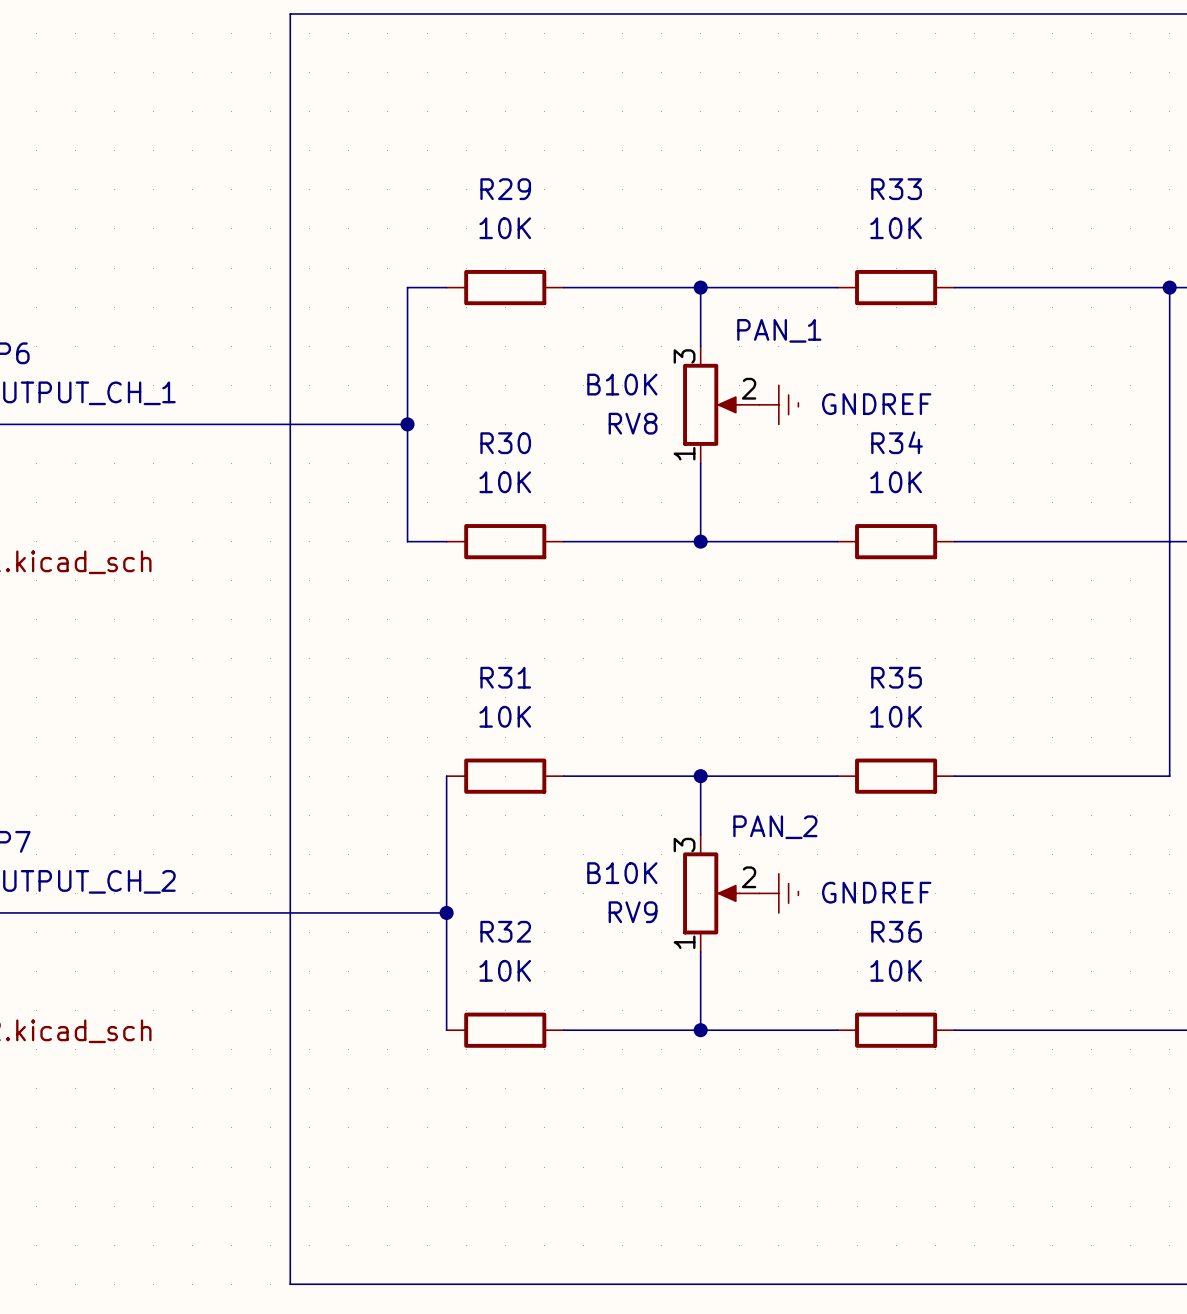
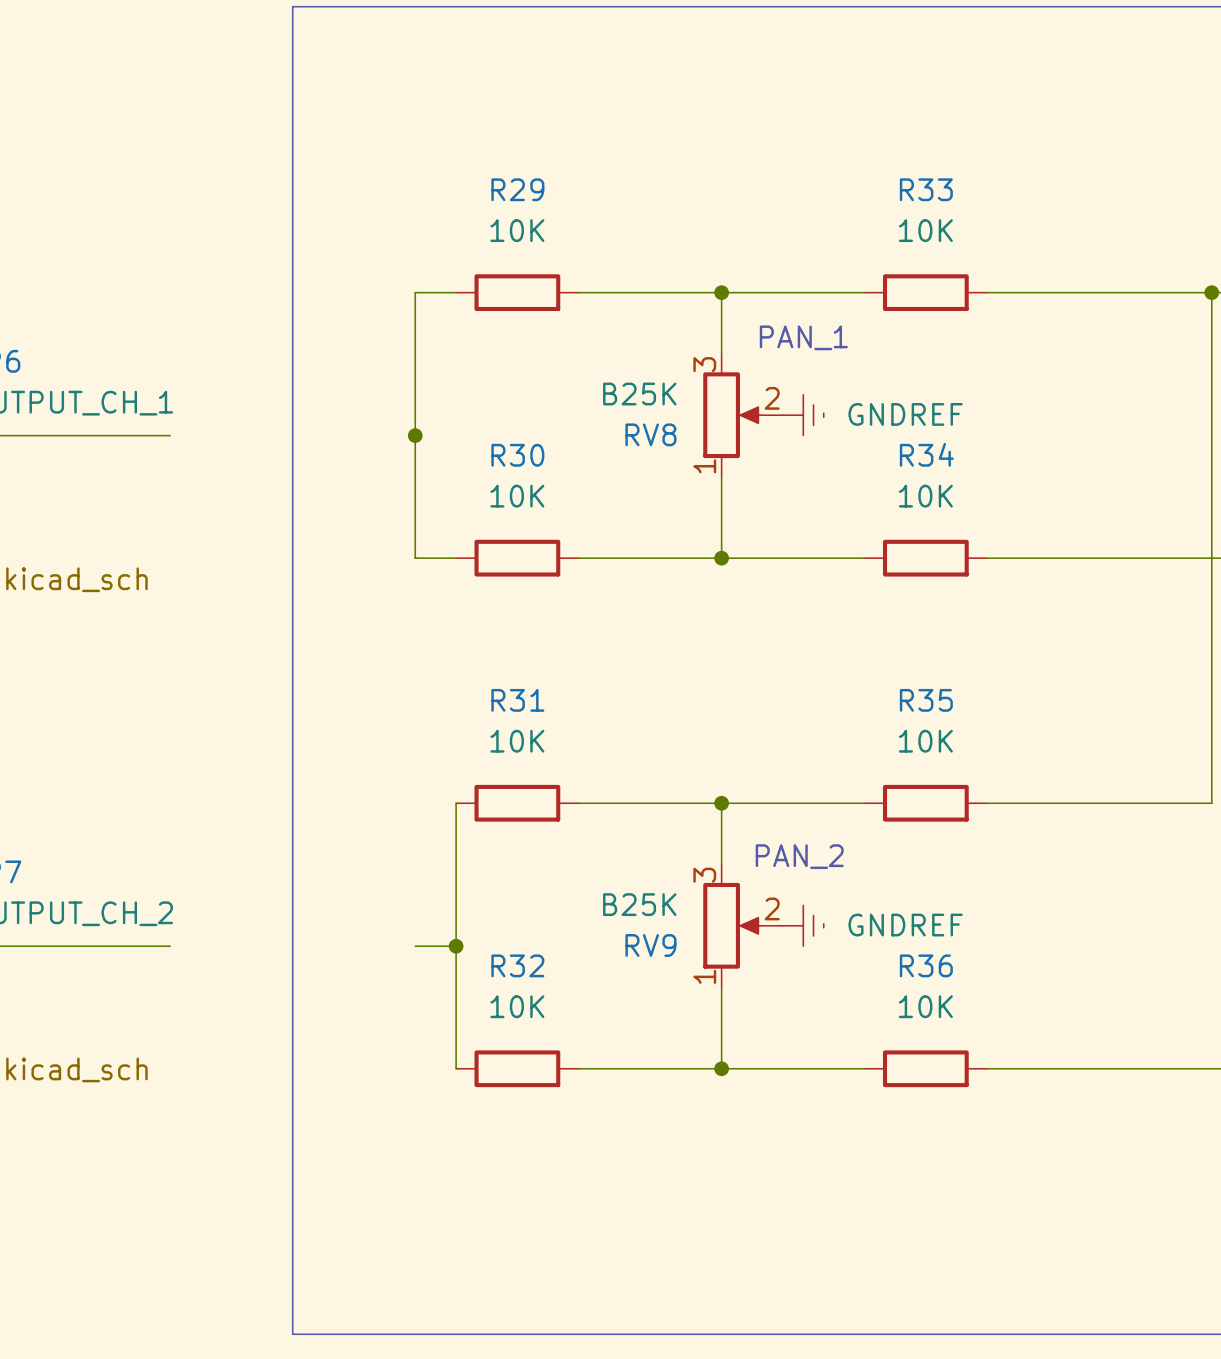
RV8 value: B10K (622, 384) -> B25K (639, 394)
wire: (173, 424) (407, 424) -> none
RV9 value: B10K (622, 873) -> B25K (639, 904)
wire: (173, 912) (407, 912) -> none

